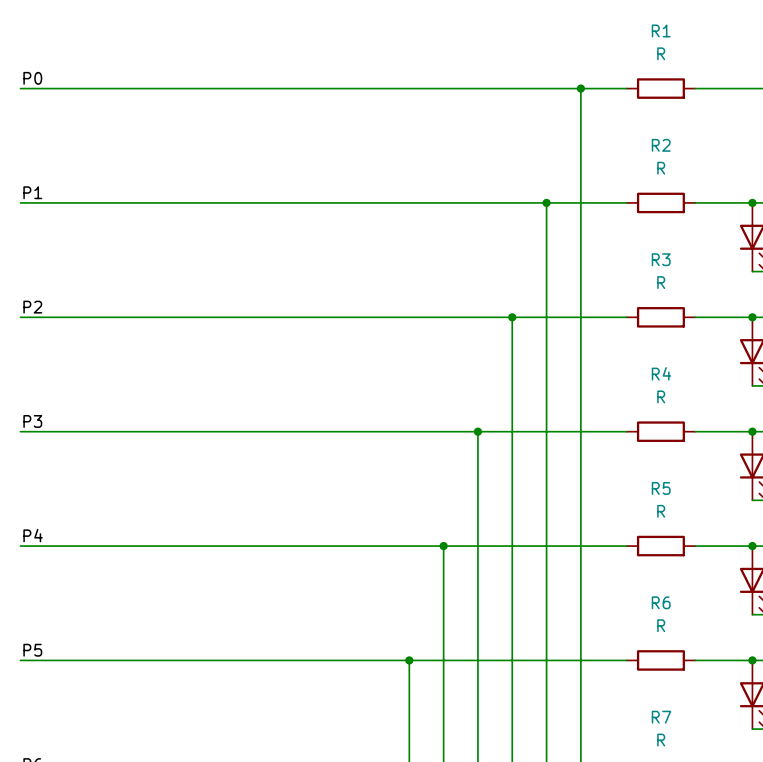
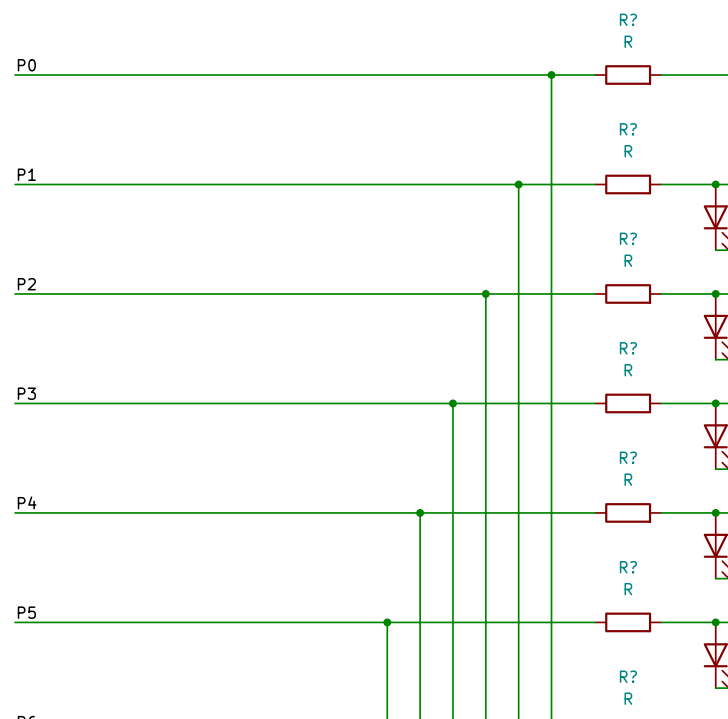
R1 name: R1 (661, 30) -> R? (628, 19)
R2 name: R2 (661, 145) -> R? (628, 129)
R3 name: R3 (661, 259) -> R? (628, 238)
R4 name: R4 (661, 373) -> R? (628, 348)
R5 name: R5 (661, 488) -> R? (628, 457)
R6 name: R6 (661, 602) -> R? (628, 567)
R7 name: R7 (661, 717) -> R? (628, 676)

